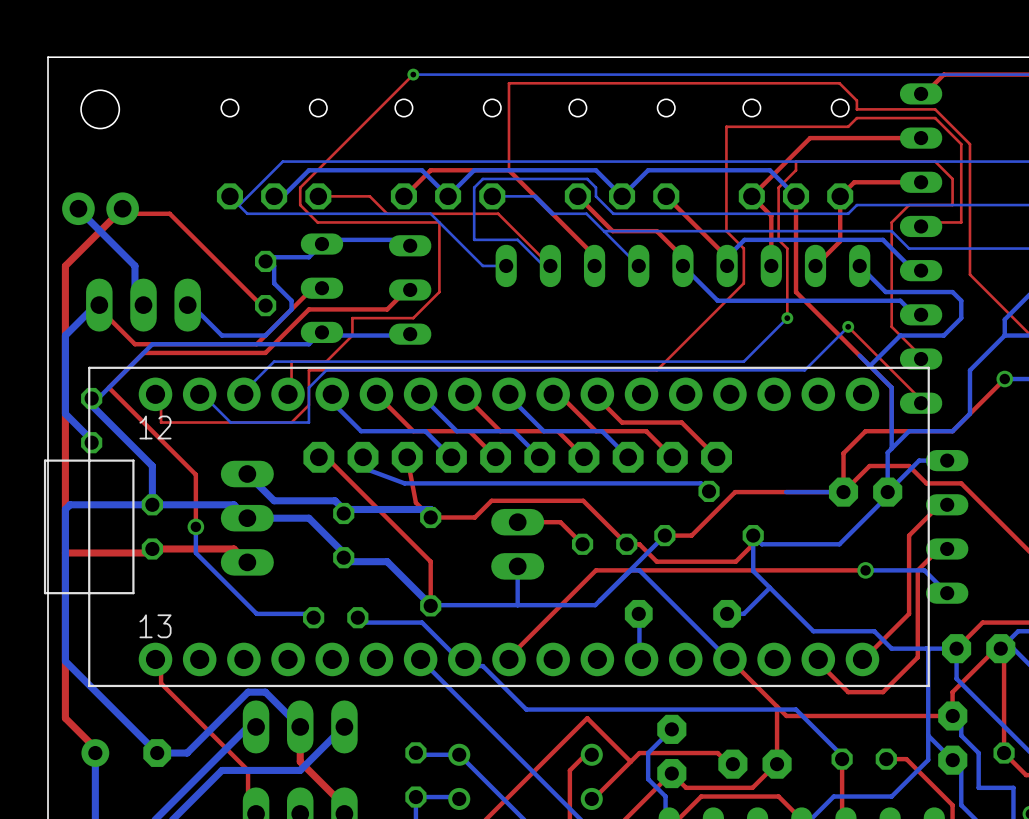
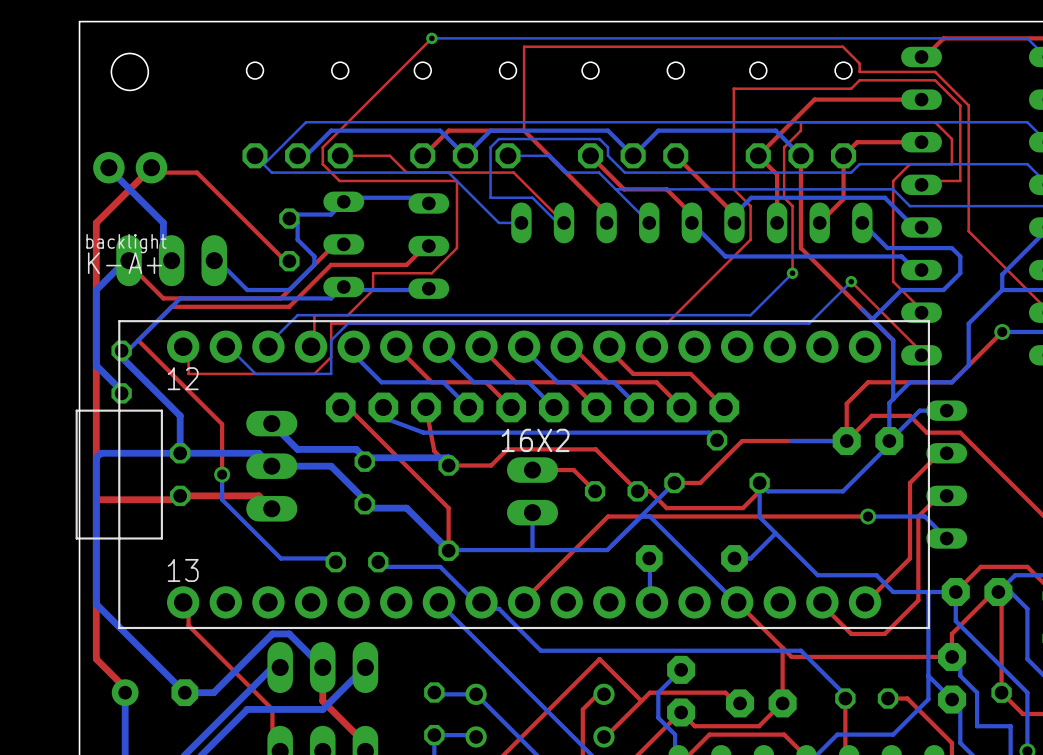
text: none -> backlight (126, 243)
text: none -> K- (104, 263)
text: none -> A+ (145, 263)
16X2 name: none -> 16X2 (535, 440)

